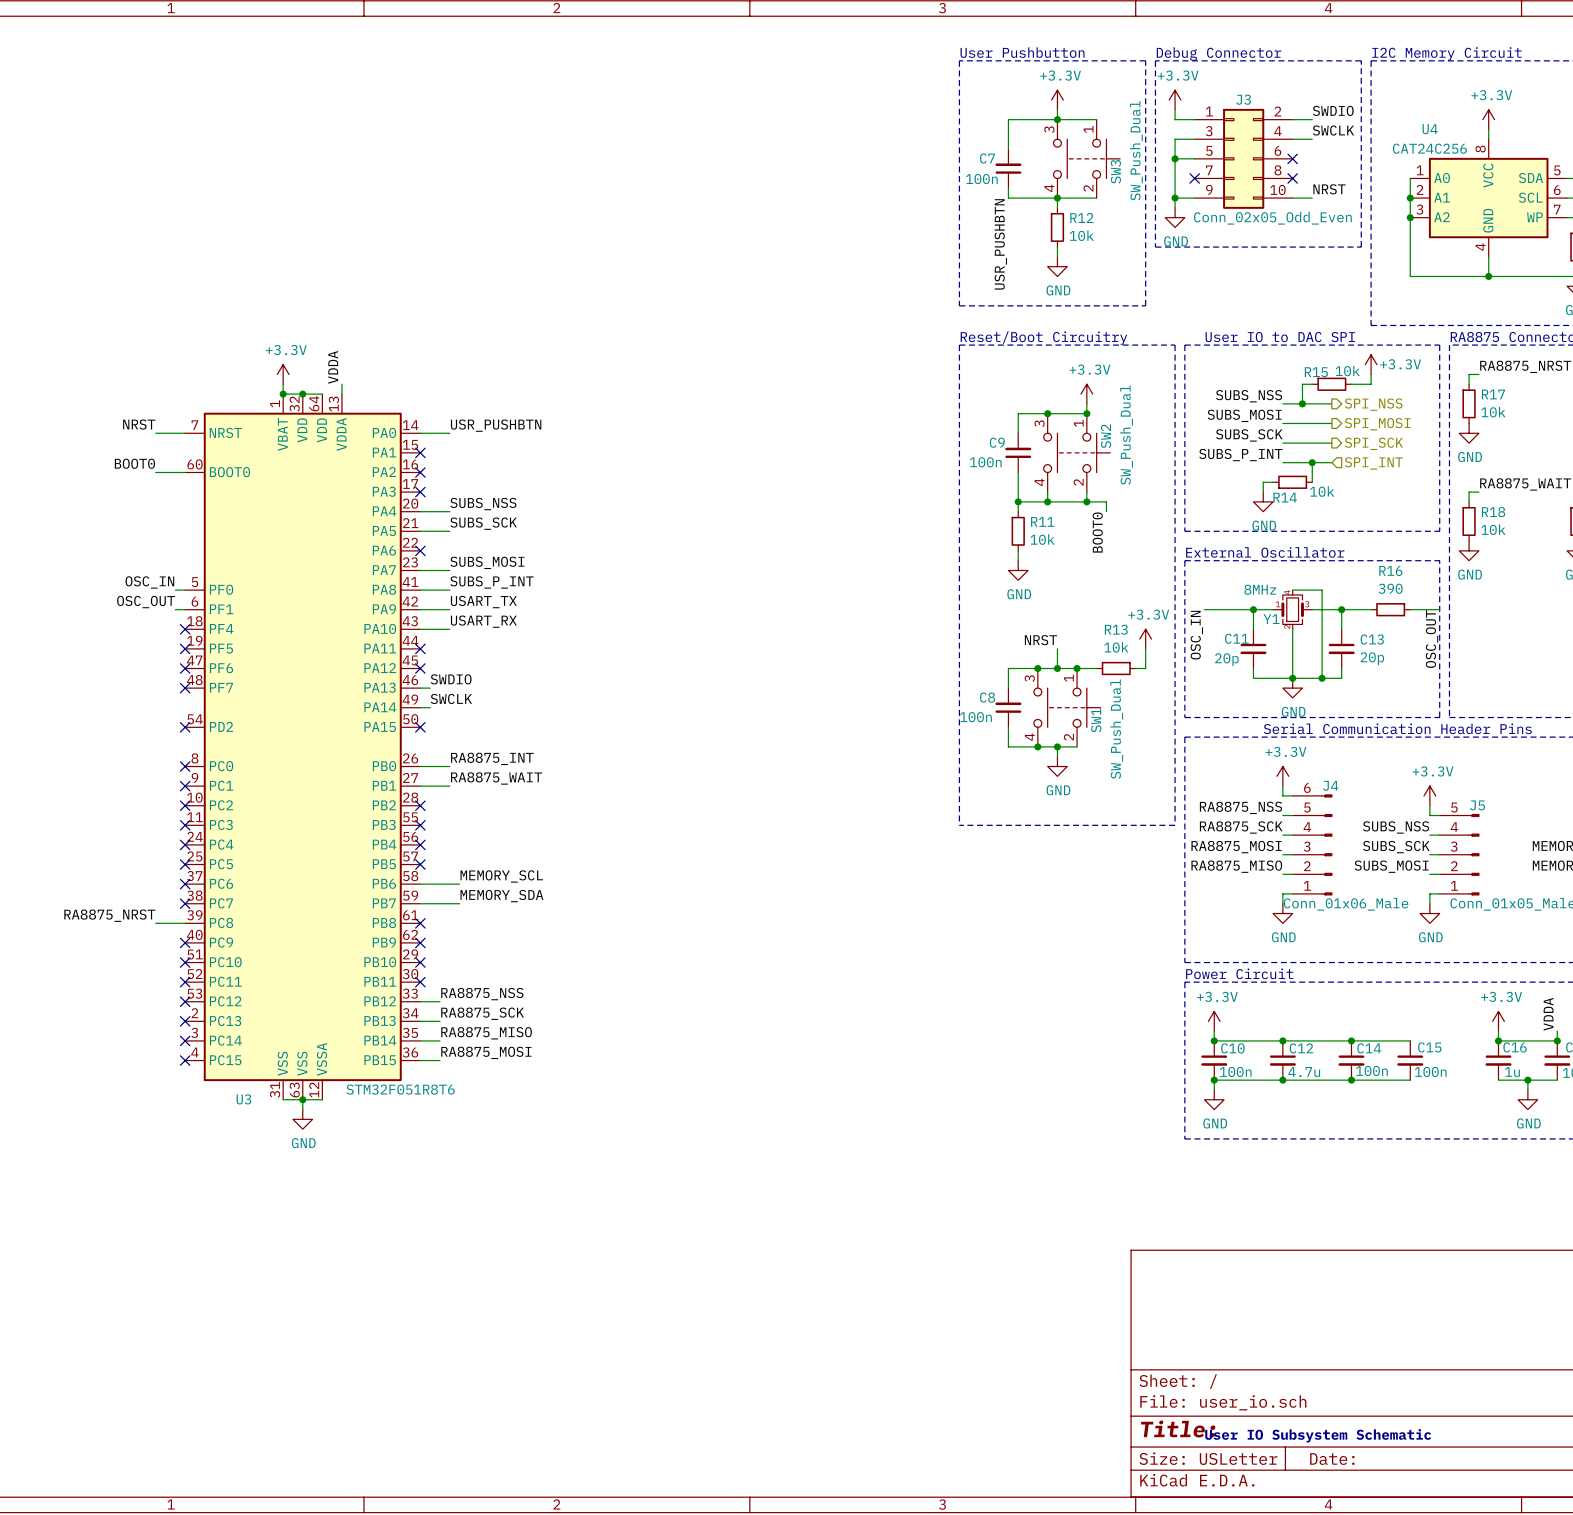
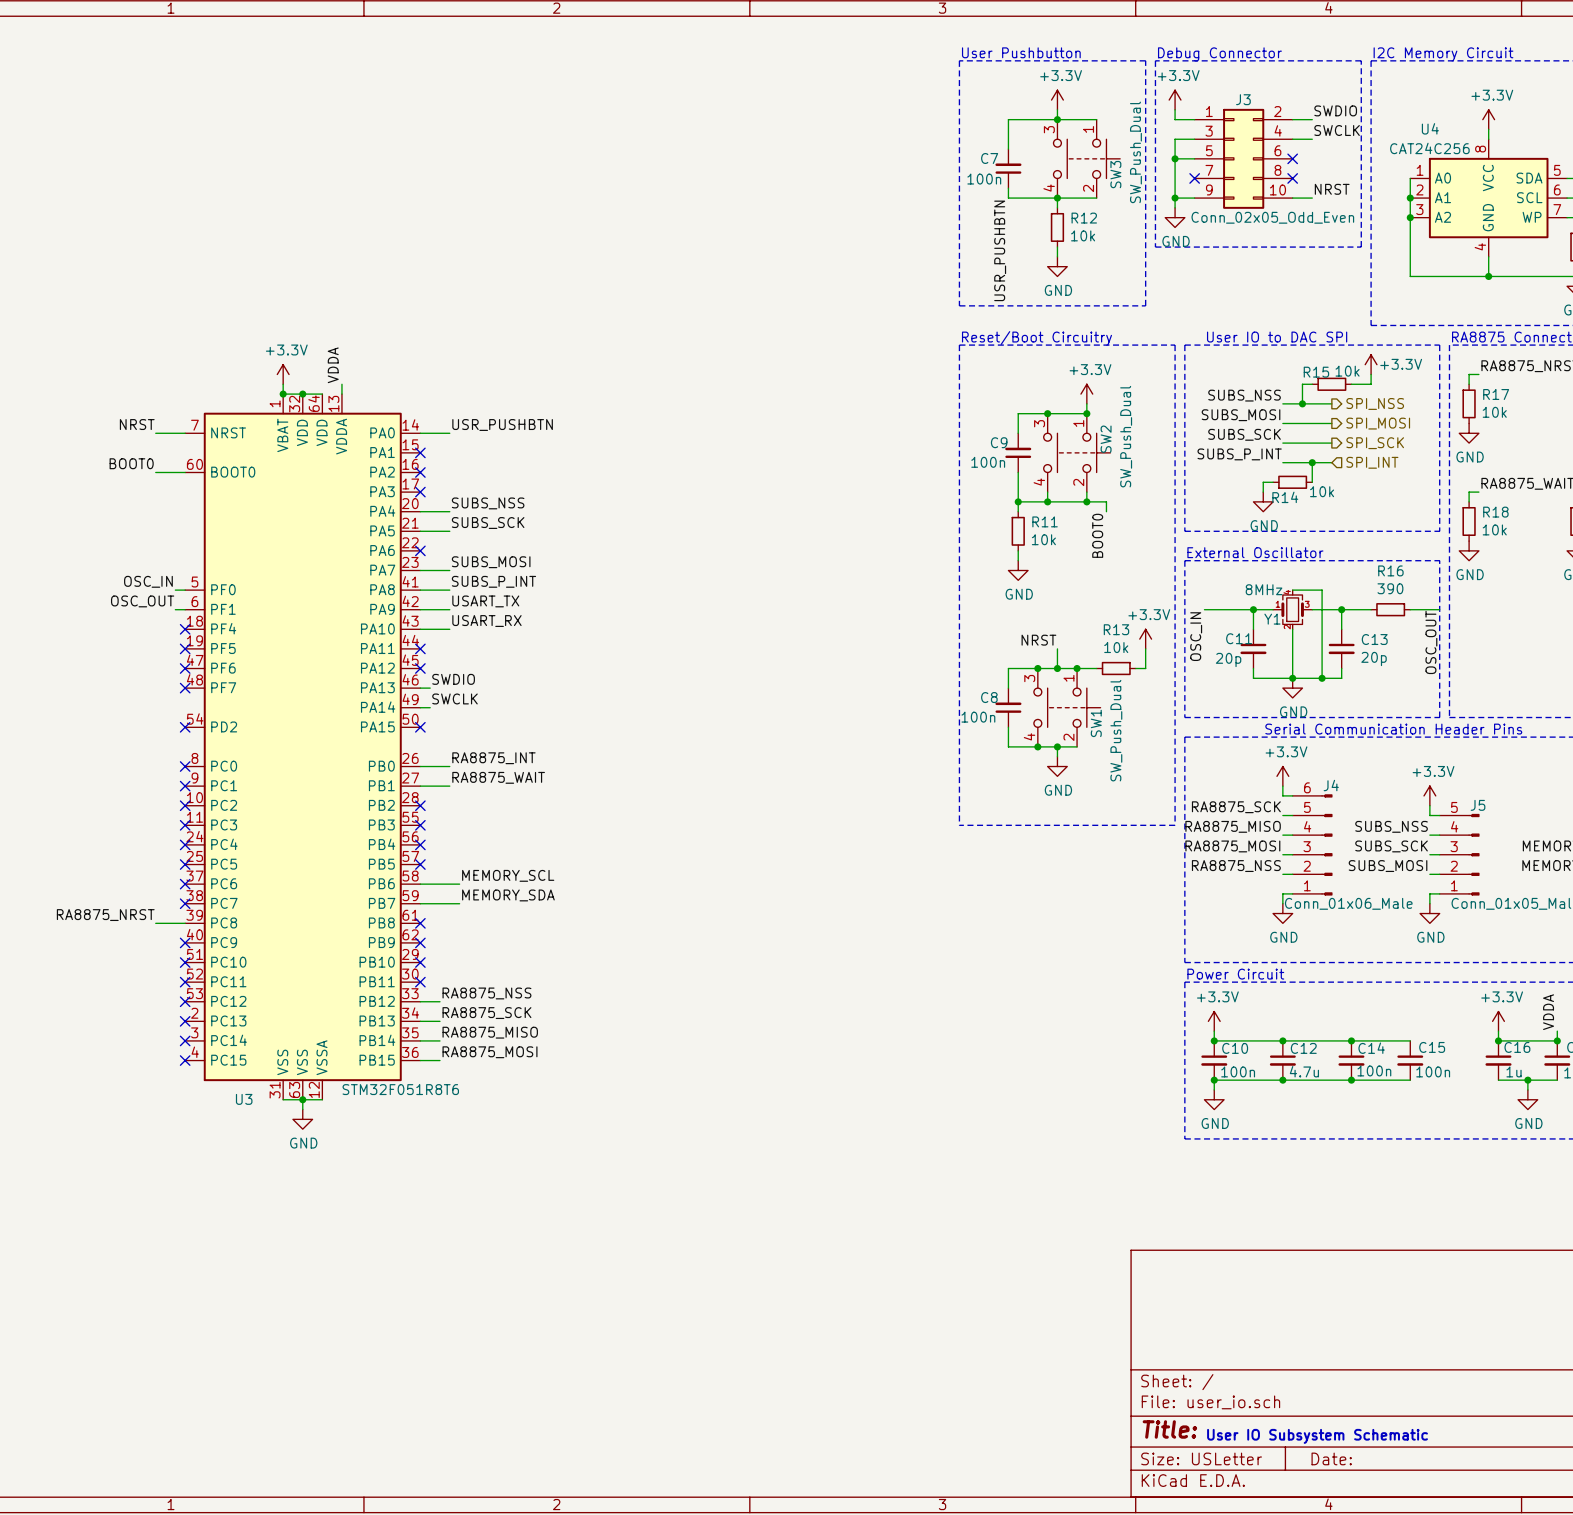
label: RA8875_NSS (1240, 807) -> RA8875_SCK (1236, 807)
label: RA8875_SCK (1241, 827) -> RA8875_MISO (1233, 826)
label: RA8875_MISO (1236, 866) -> RA8875_NSS (1236, 866)

